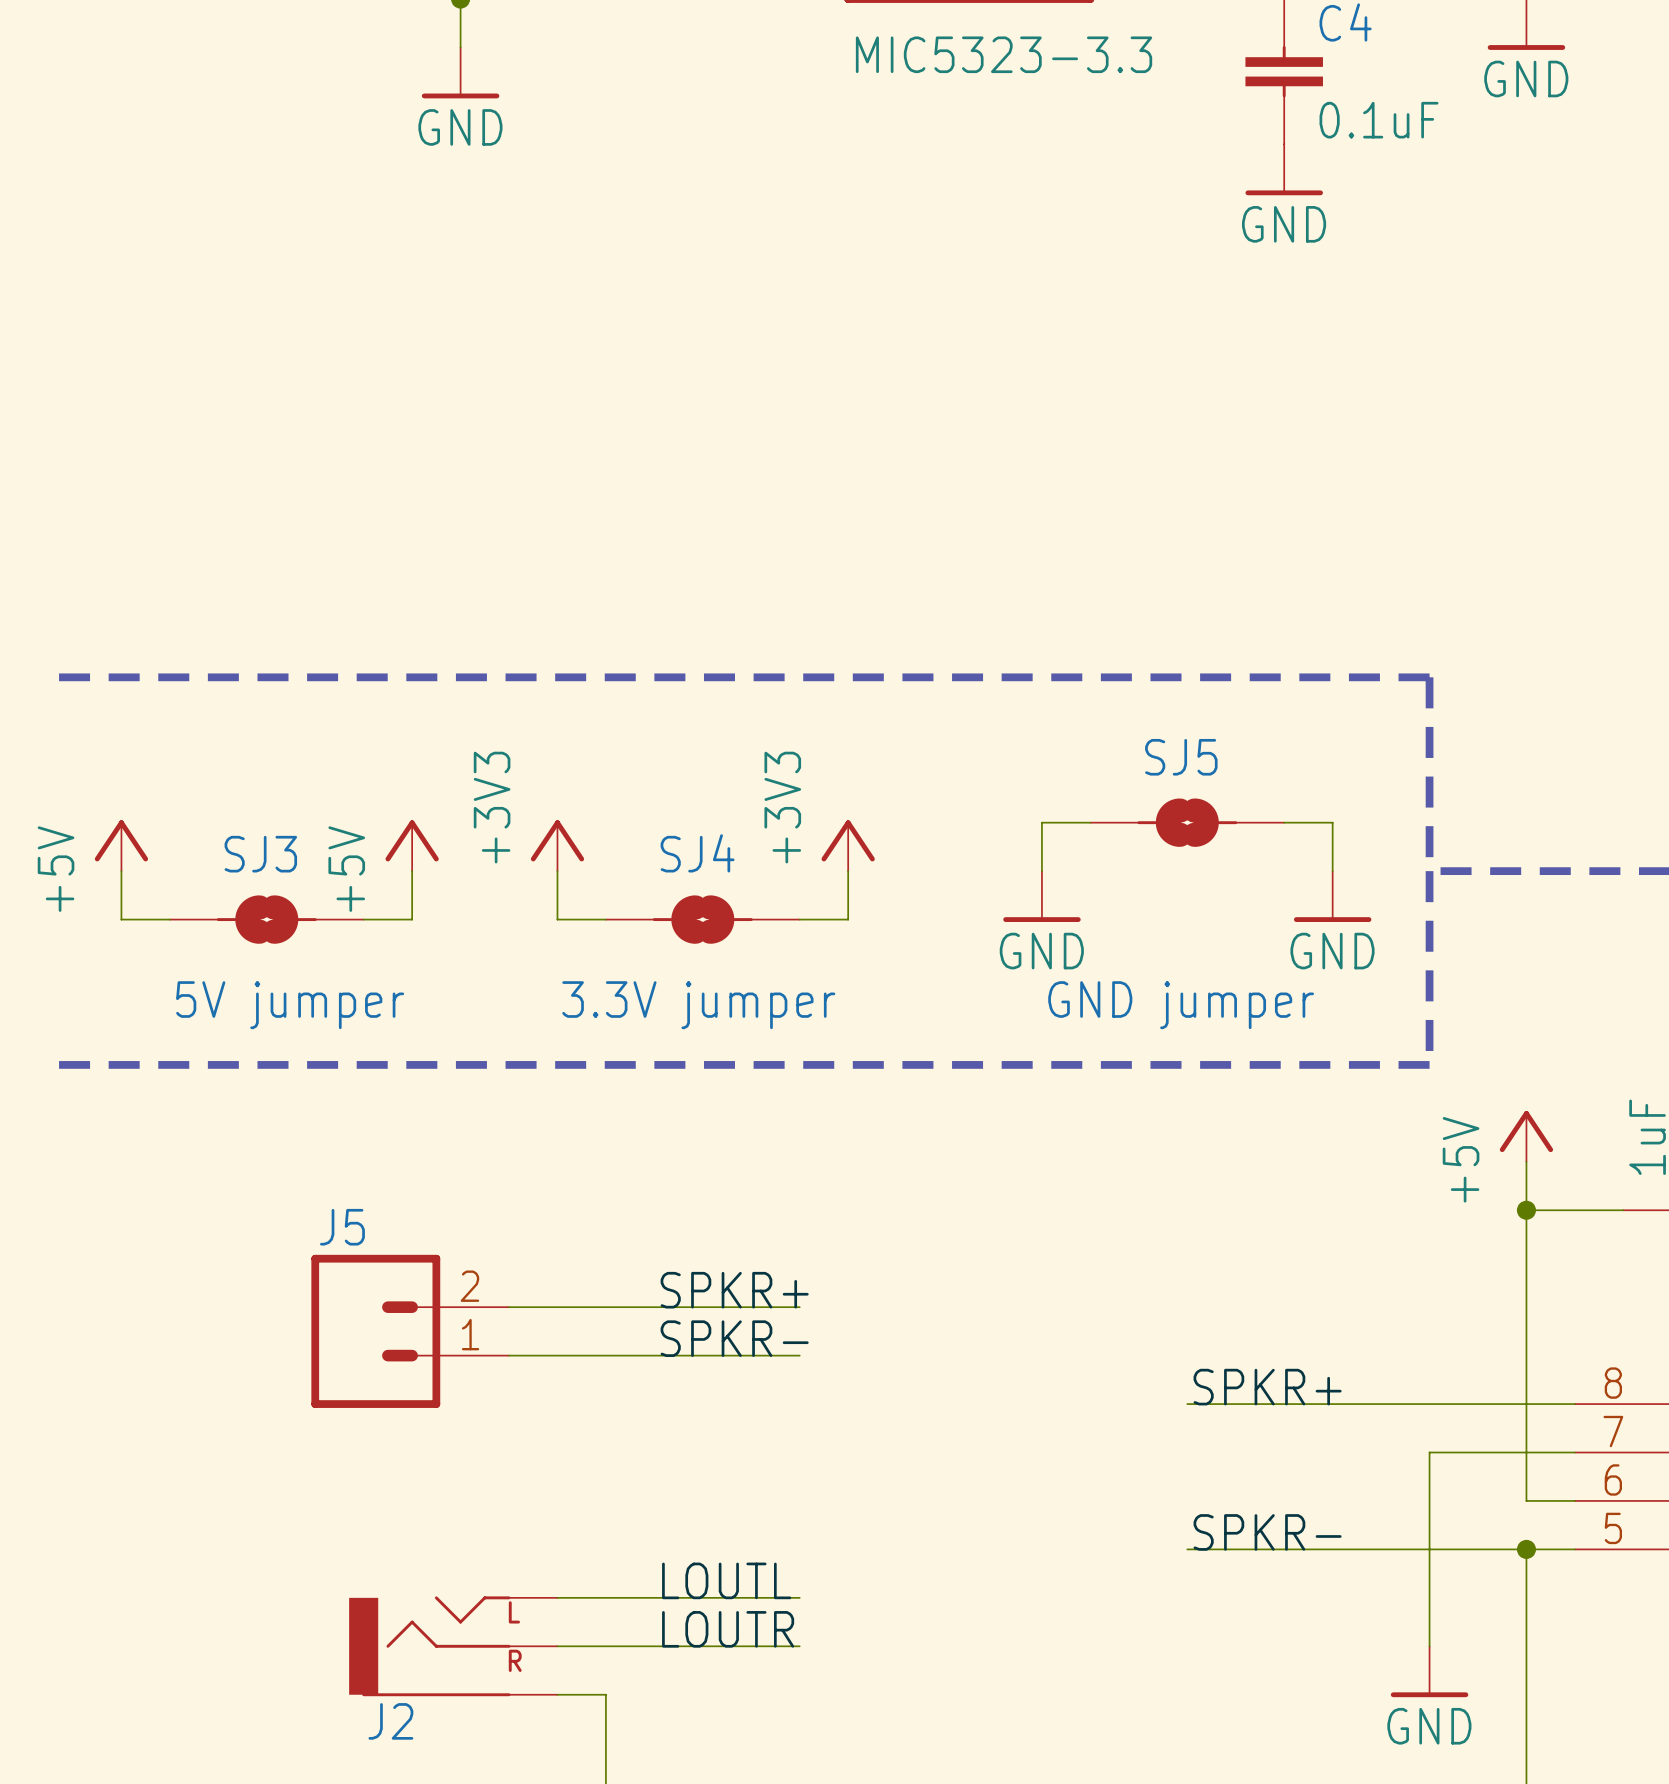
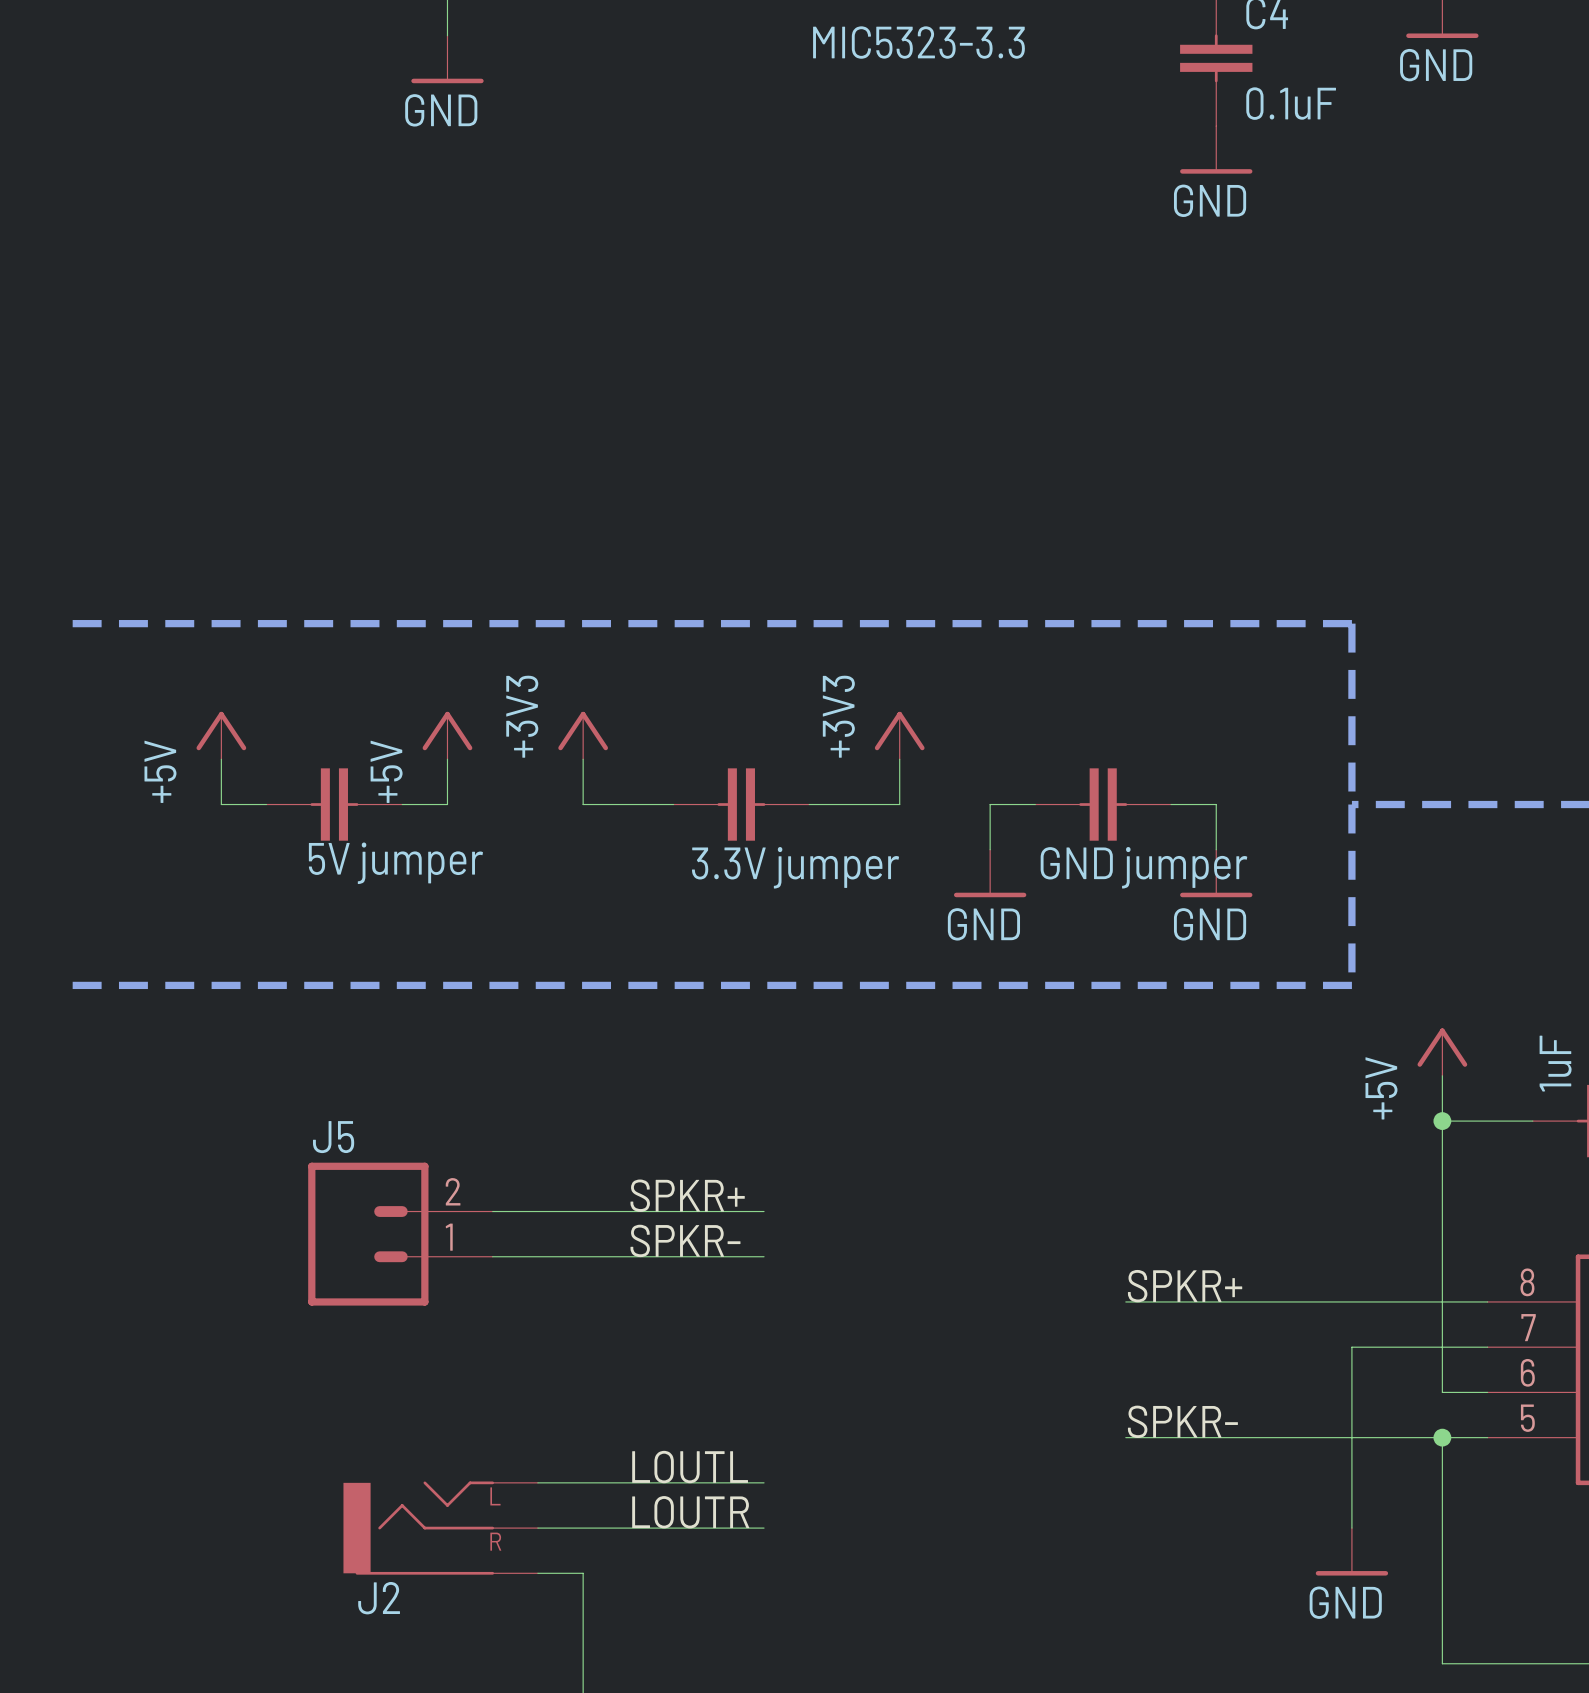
power symbol: none -> +5V (221, 735)
wire: none -> (583, 759) (583, 804) (673, 804)
wire: (1090, 822) (1041, 822) (1041, 871) -> (1035, 804) (990, 804) (990, 849)
SJ5: (1187, 822) -> none
wire: (1284, 822) (1332, 822) (1332, 871) -> (1171, 804) (1216, 804) (1216, 849)
power symbol: +5V (121, 845) -> none
power symbol position: +5V (412, 845) -> +5V (447, 735)
power symbol position: +3V3 (557, 845) -> +3V3 (583, 735)
power symbol position: +3V3 (848, 845) -> +3V3 (899, 735)
wire: (121, 871) (121, 919) (169, 919) -> (221, 759) (221, 804) (266, 804)
part: none -> 5V jumper (334, 804)
wire: (412, 871) (412, 919) (363, 919) -> (402, 804) (447, 804) (447, 759)
wire: (557, 871) (557, 919) (605, 919) -> none
part: none -> 3.3V jumper (741, 804)
wire: (848, 871) (848, 919) (799, 919) -> (809, 804) (899, 804) (899, 759)
part: none -> GND jumper (1103, 804)
power symbol position: GND (1041, 896) -> GND (990, 873)
power symbol position: GND (1332, 896) -> GND (1216, 873)
SJ3: (266, 919) -> none
SJ4: (702, 919) -> none
text: 5V jumper (290, 1005) -> none
text: 3.3V jumper (698, 1005) -> none
text: GND jumper (1181, 1005) -> none

